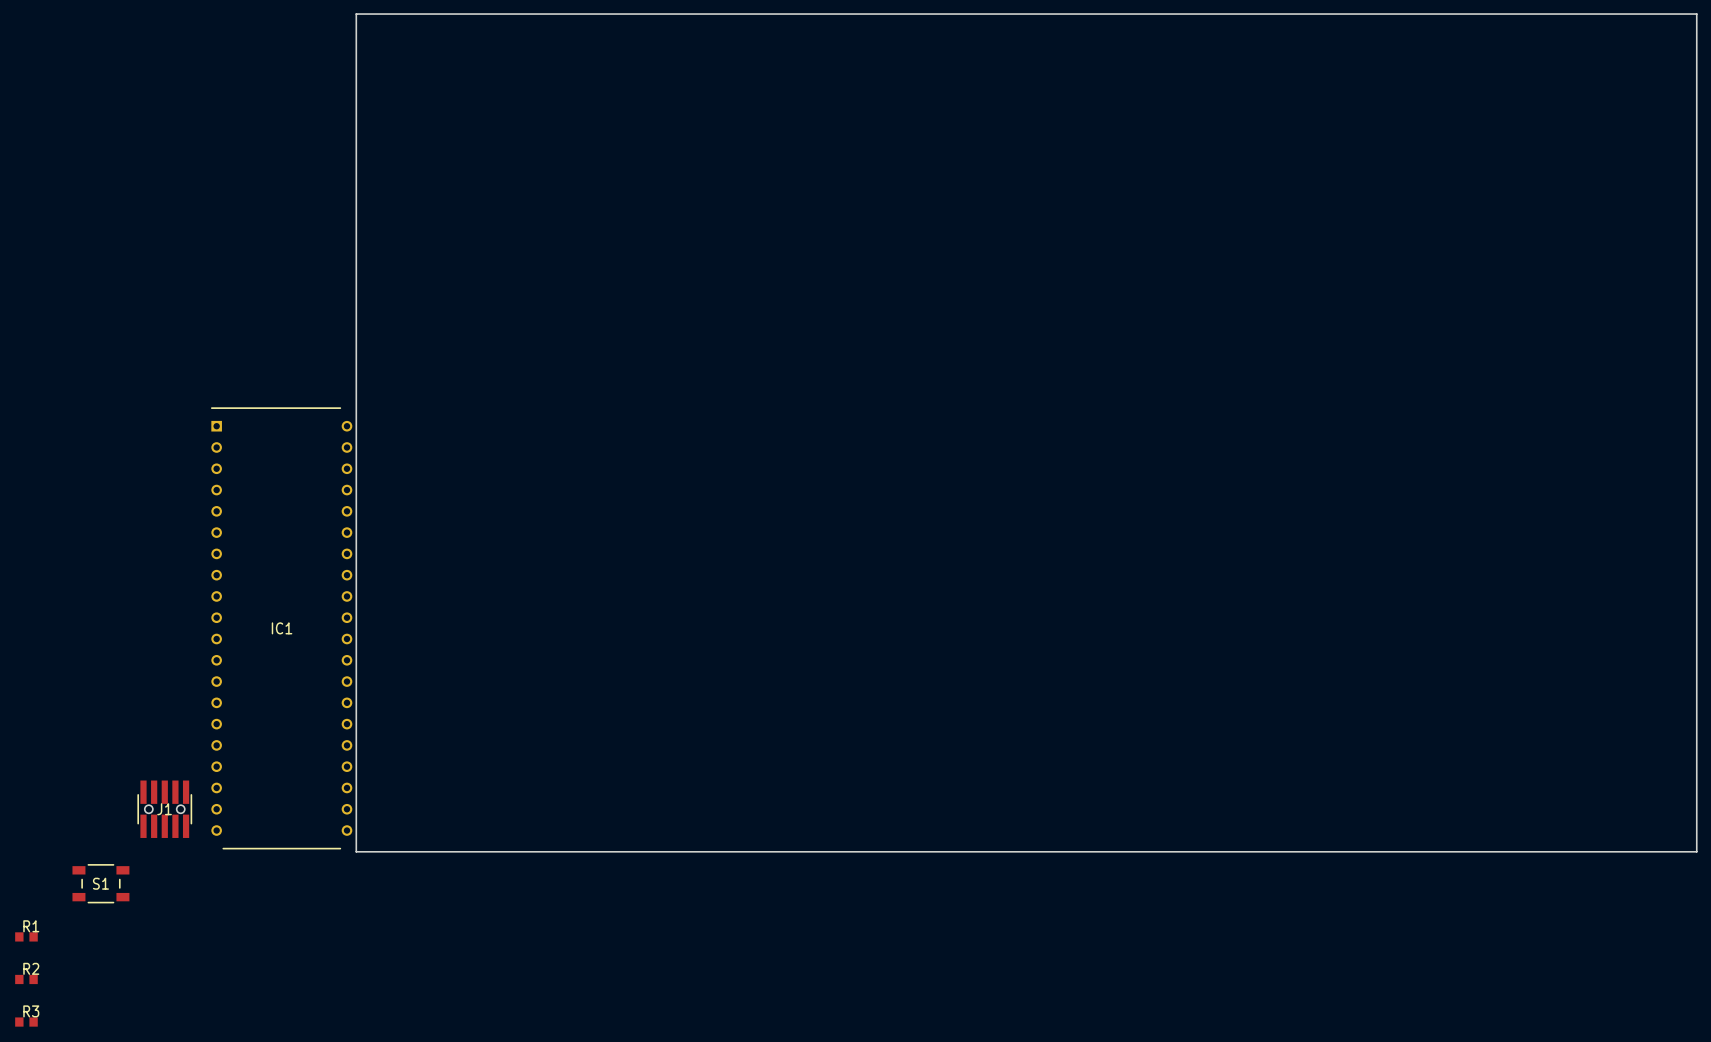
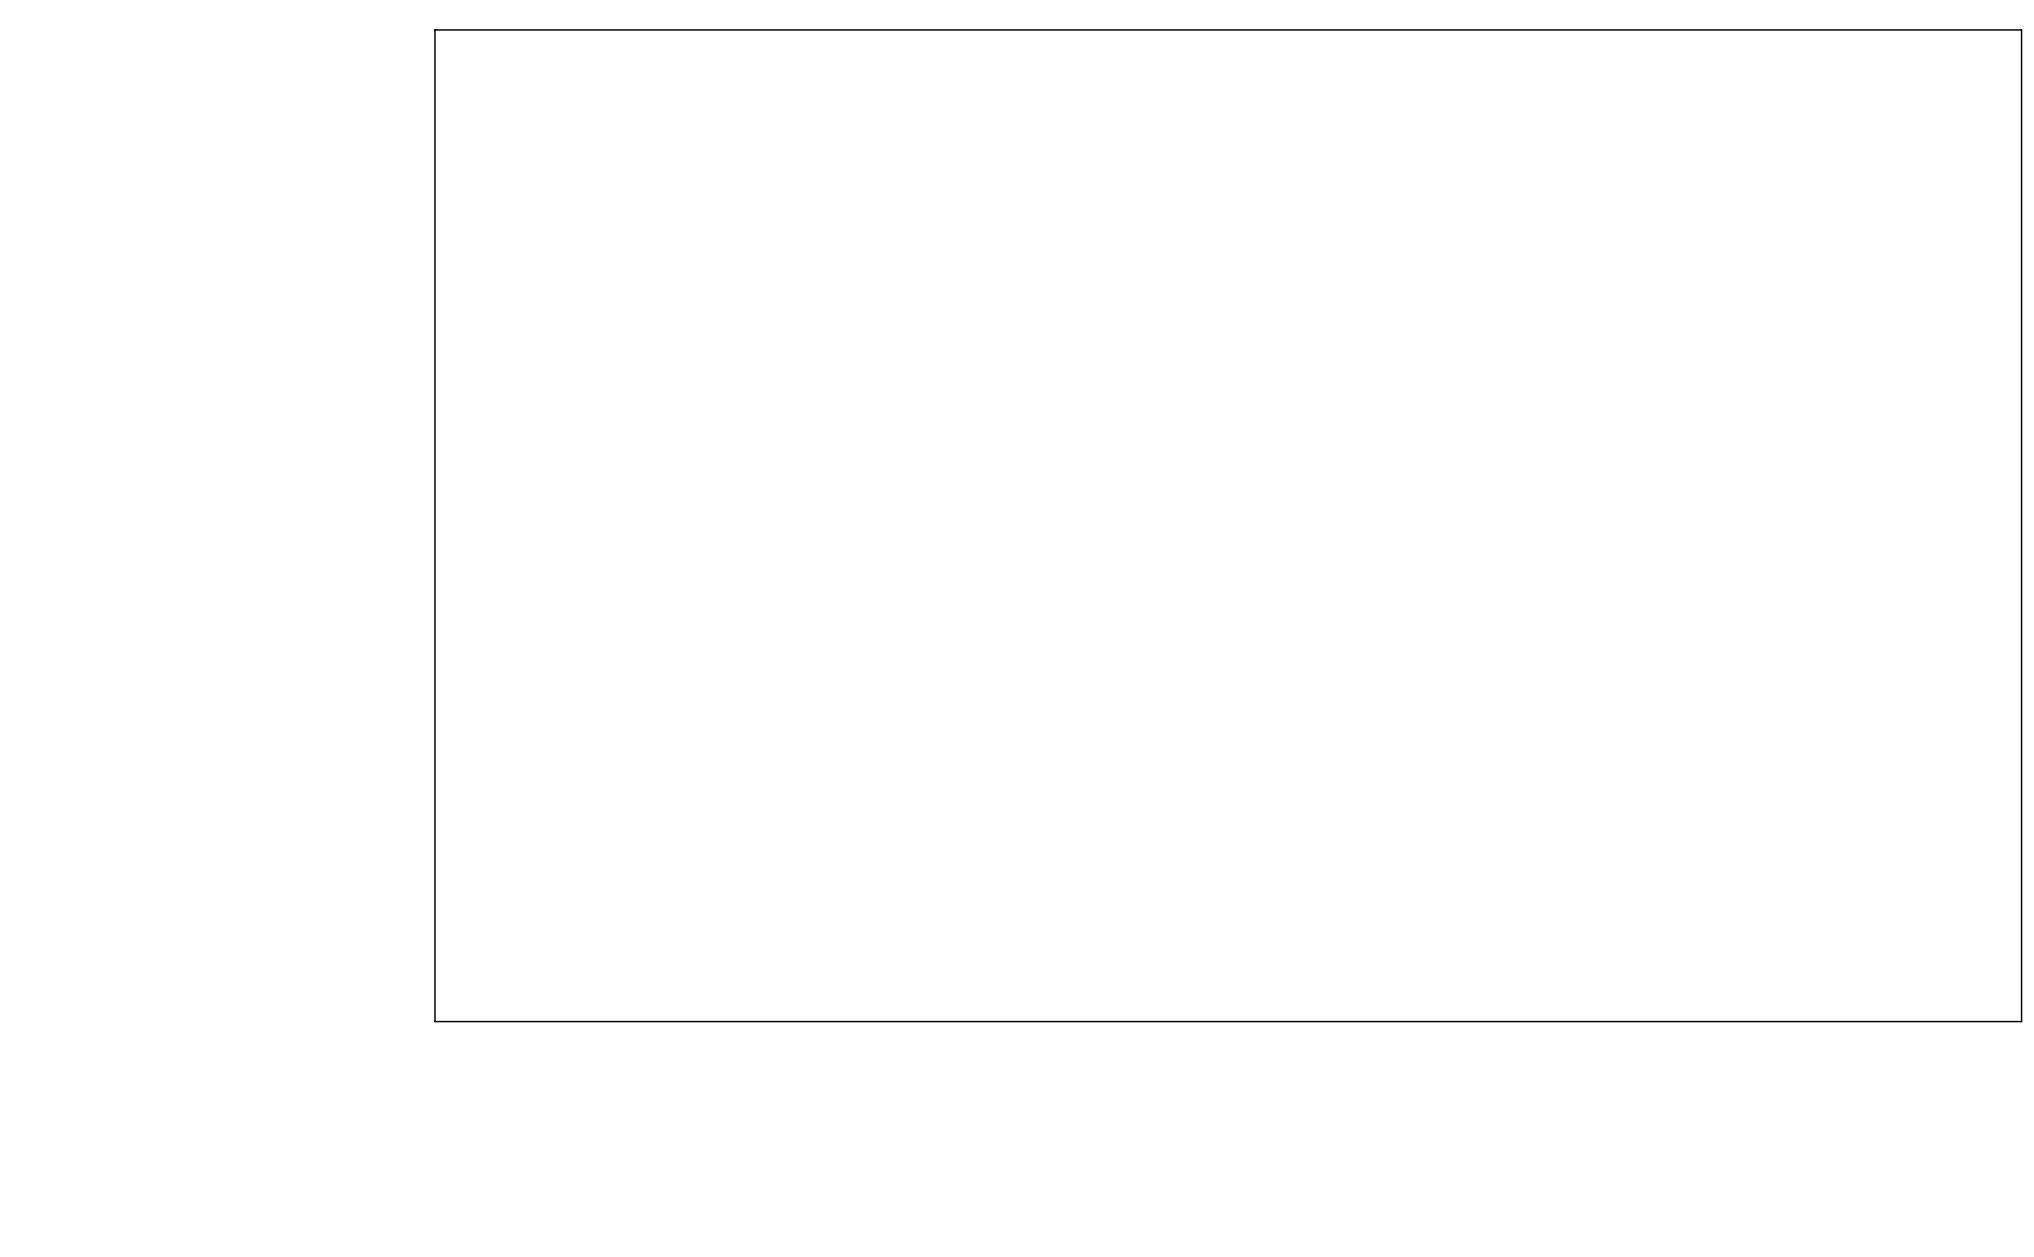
IC1: (281, 628) -> none
J1: (164, 809) -> none
S1: (100, 883) -> none
R1: (26, 936) -> none
R2: (26, 979) -> none
R3: (26, 1022) -> none

